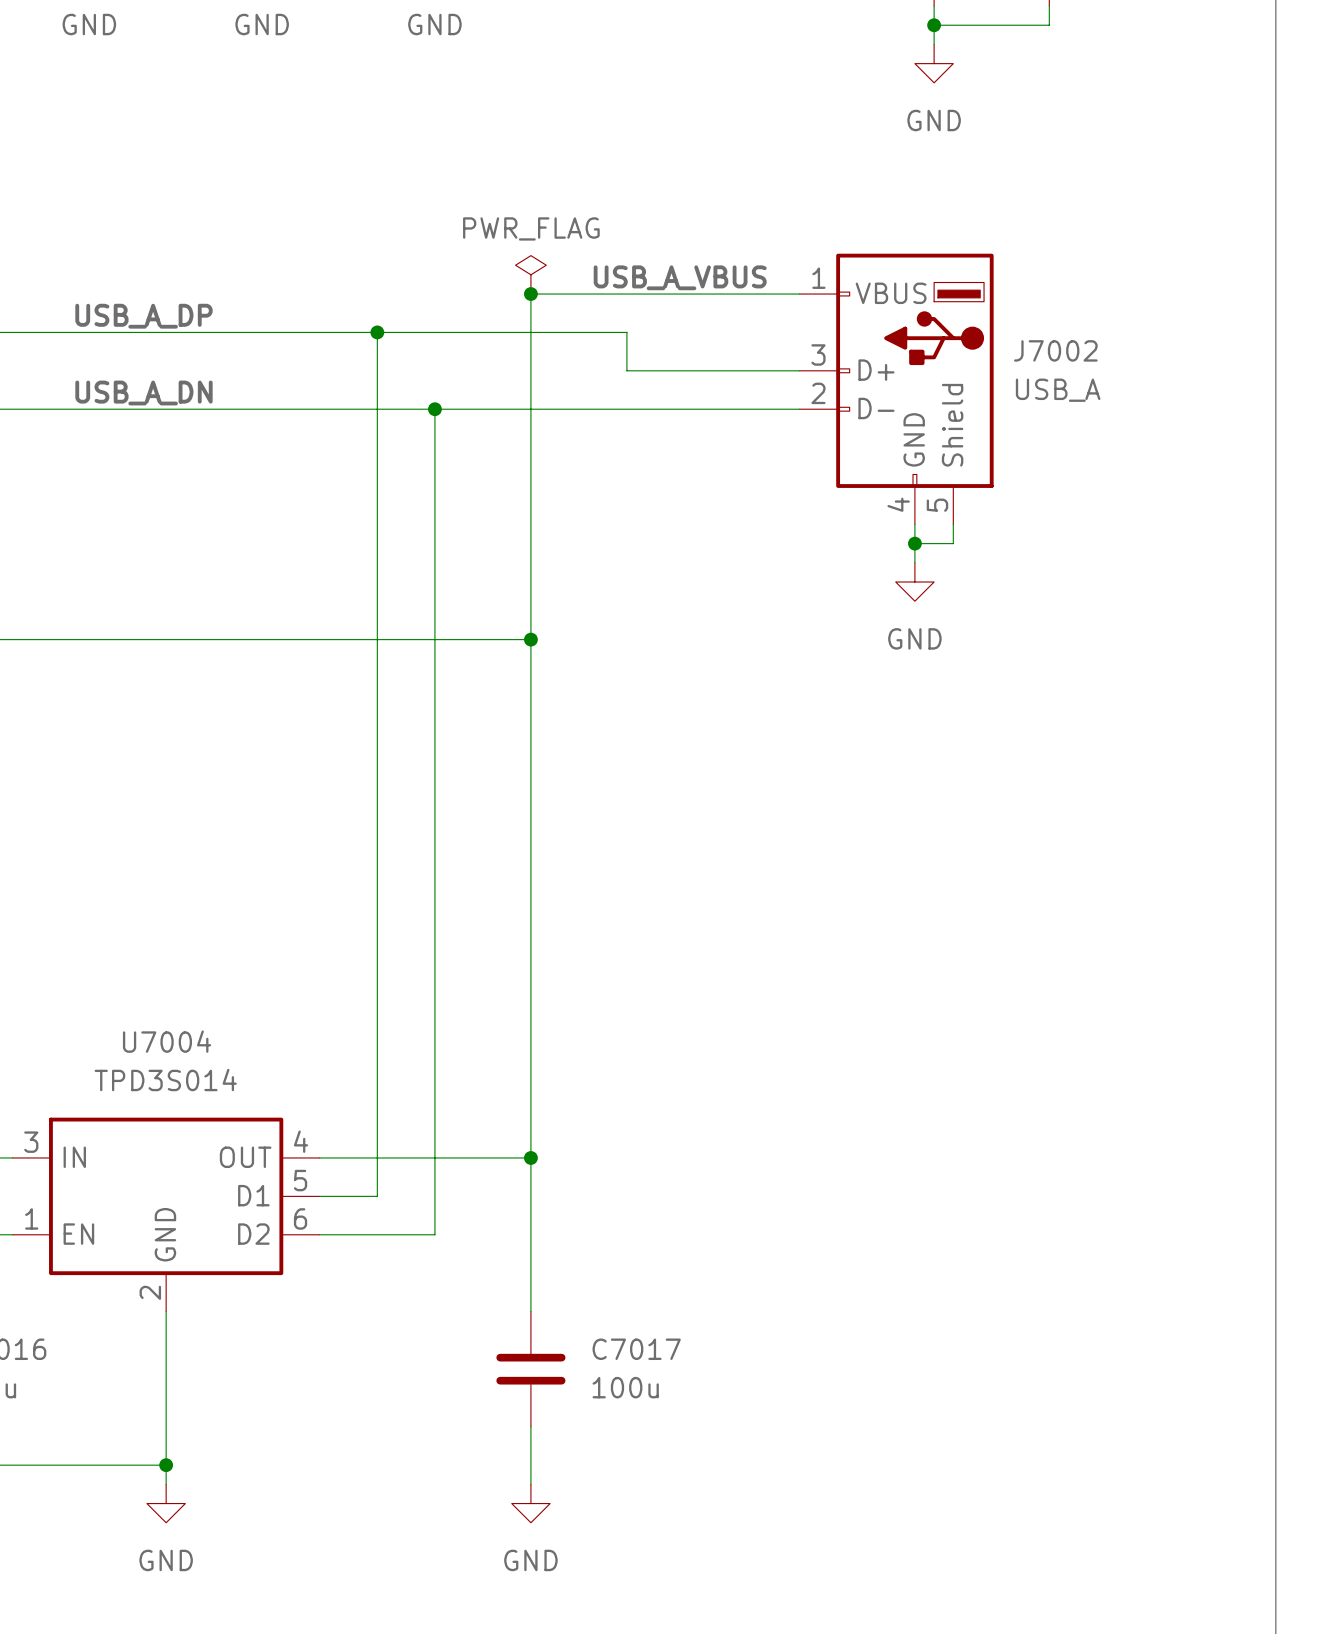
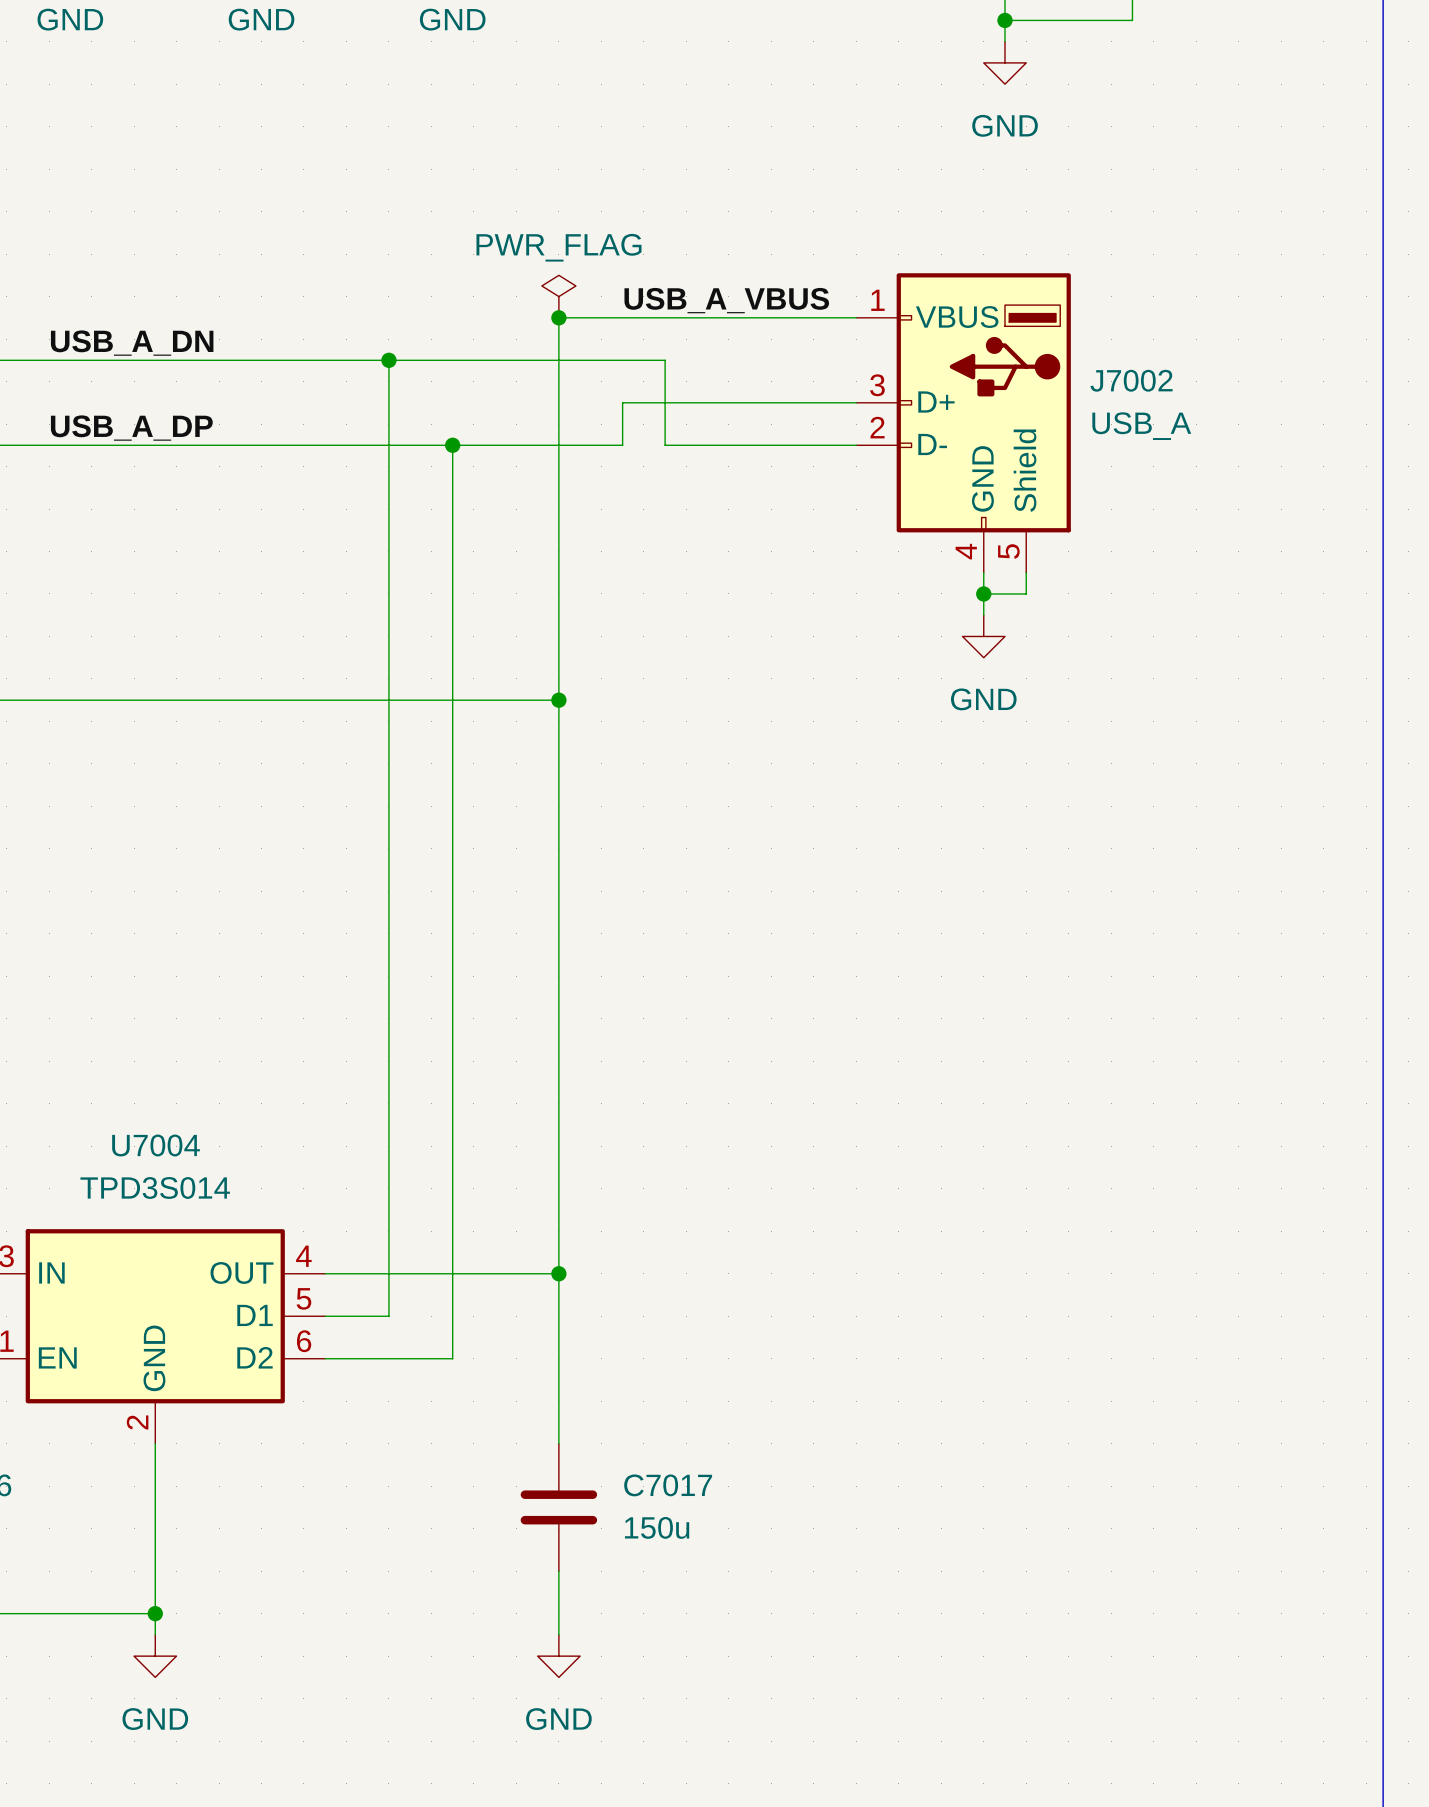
label: USB_A_DP (143, 316) -> USB_A_DN (132, 343)
label: USB_A_DN (143, 393) -> USB_A_DP (131, 428)
wire: (588, 409) (626, 409) -> (622, 445) (622, 402) (665, 402) (665, 445)
C7017 value: 100u (625, 1387) -> 150u (657, 1527)

